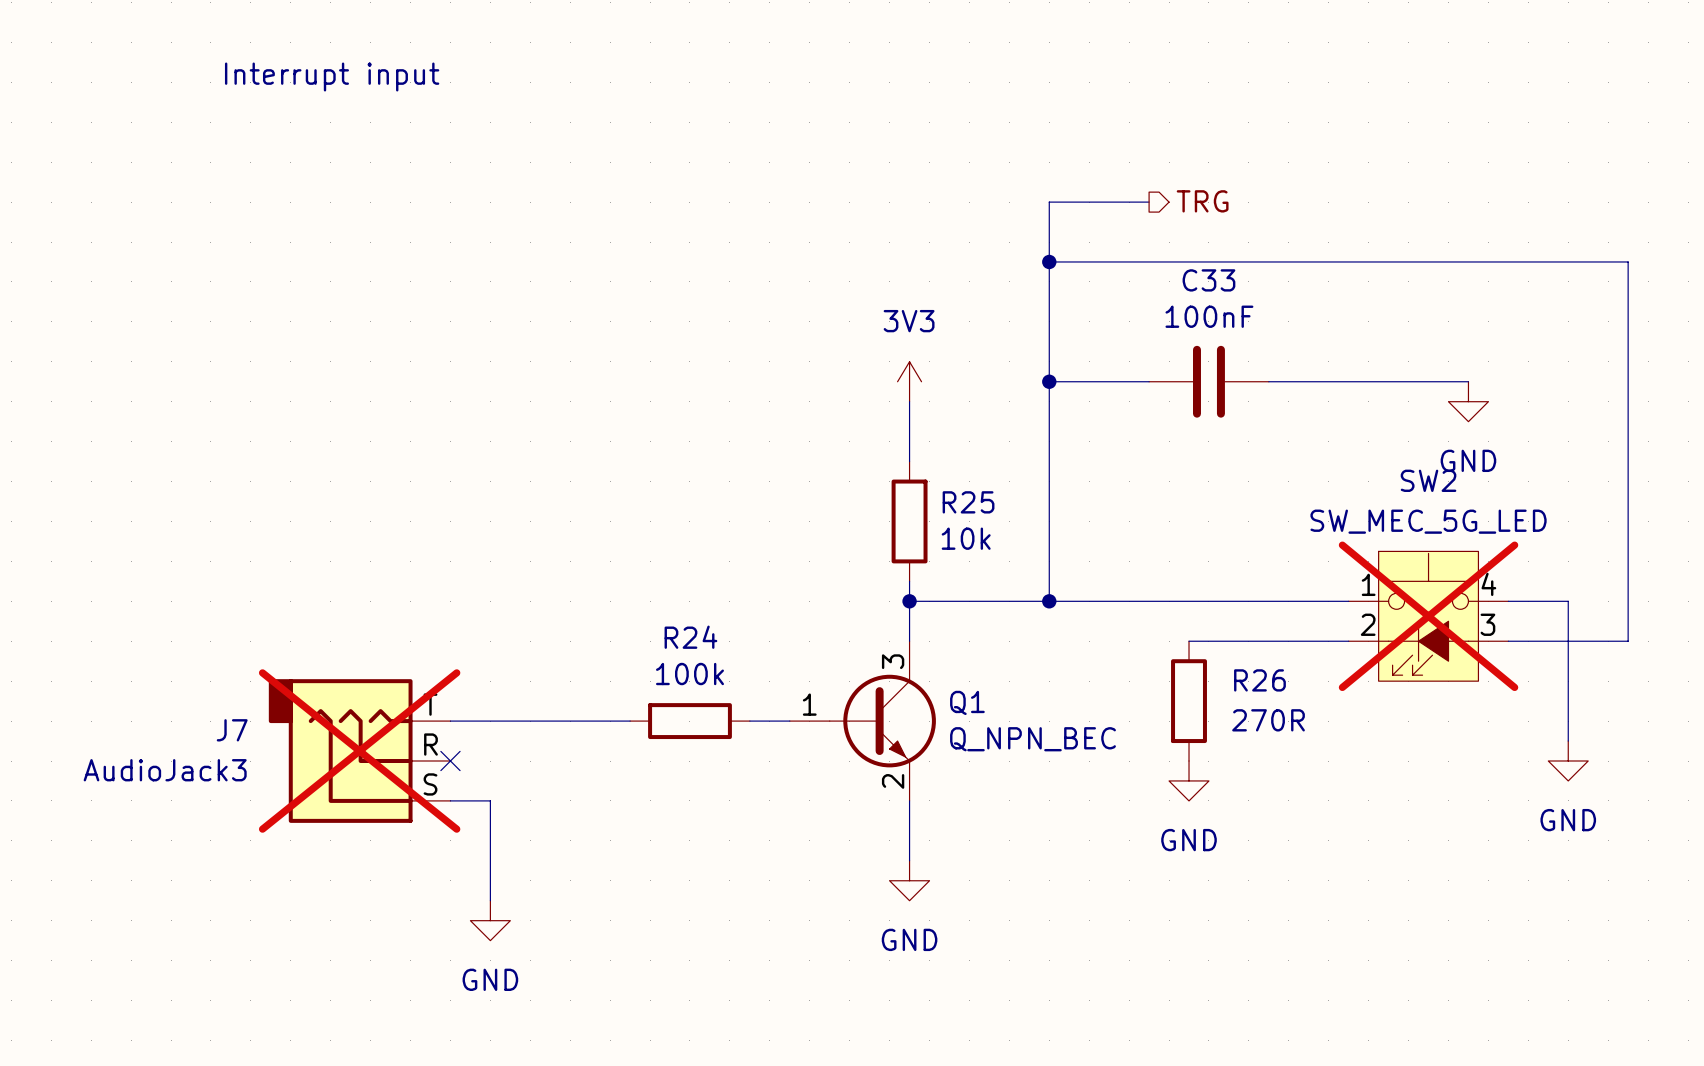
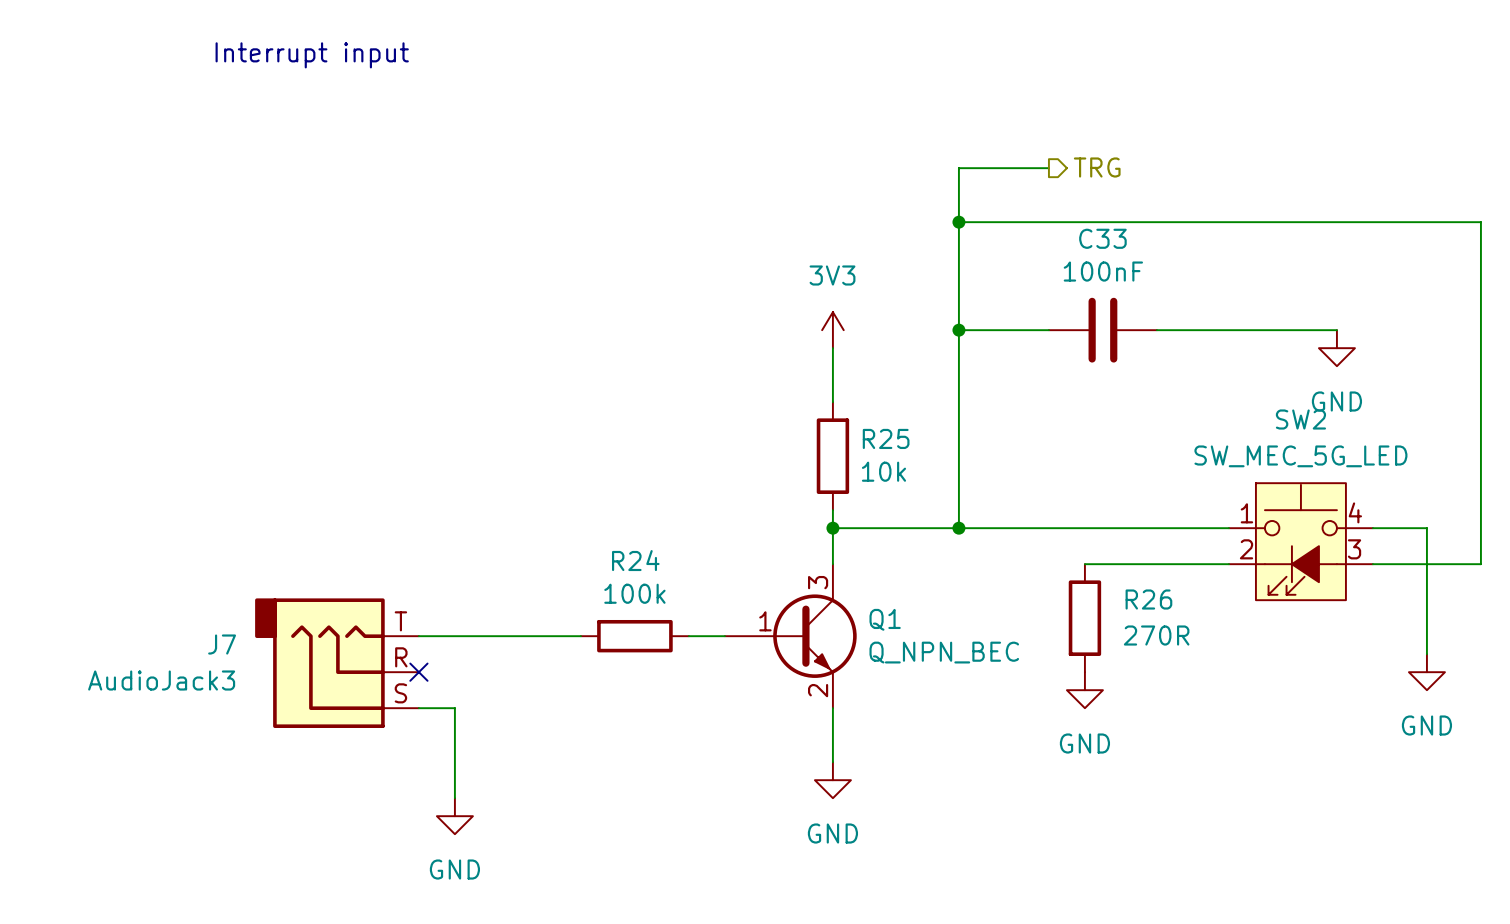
SW2 do-not-place cross: (1428, 616) -> none
Q1 symbol: [789, 641, 936, 801] -> [724, 564, 857, 709]
J7 do-not-place cross: (359, 751) -> none

